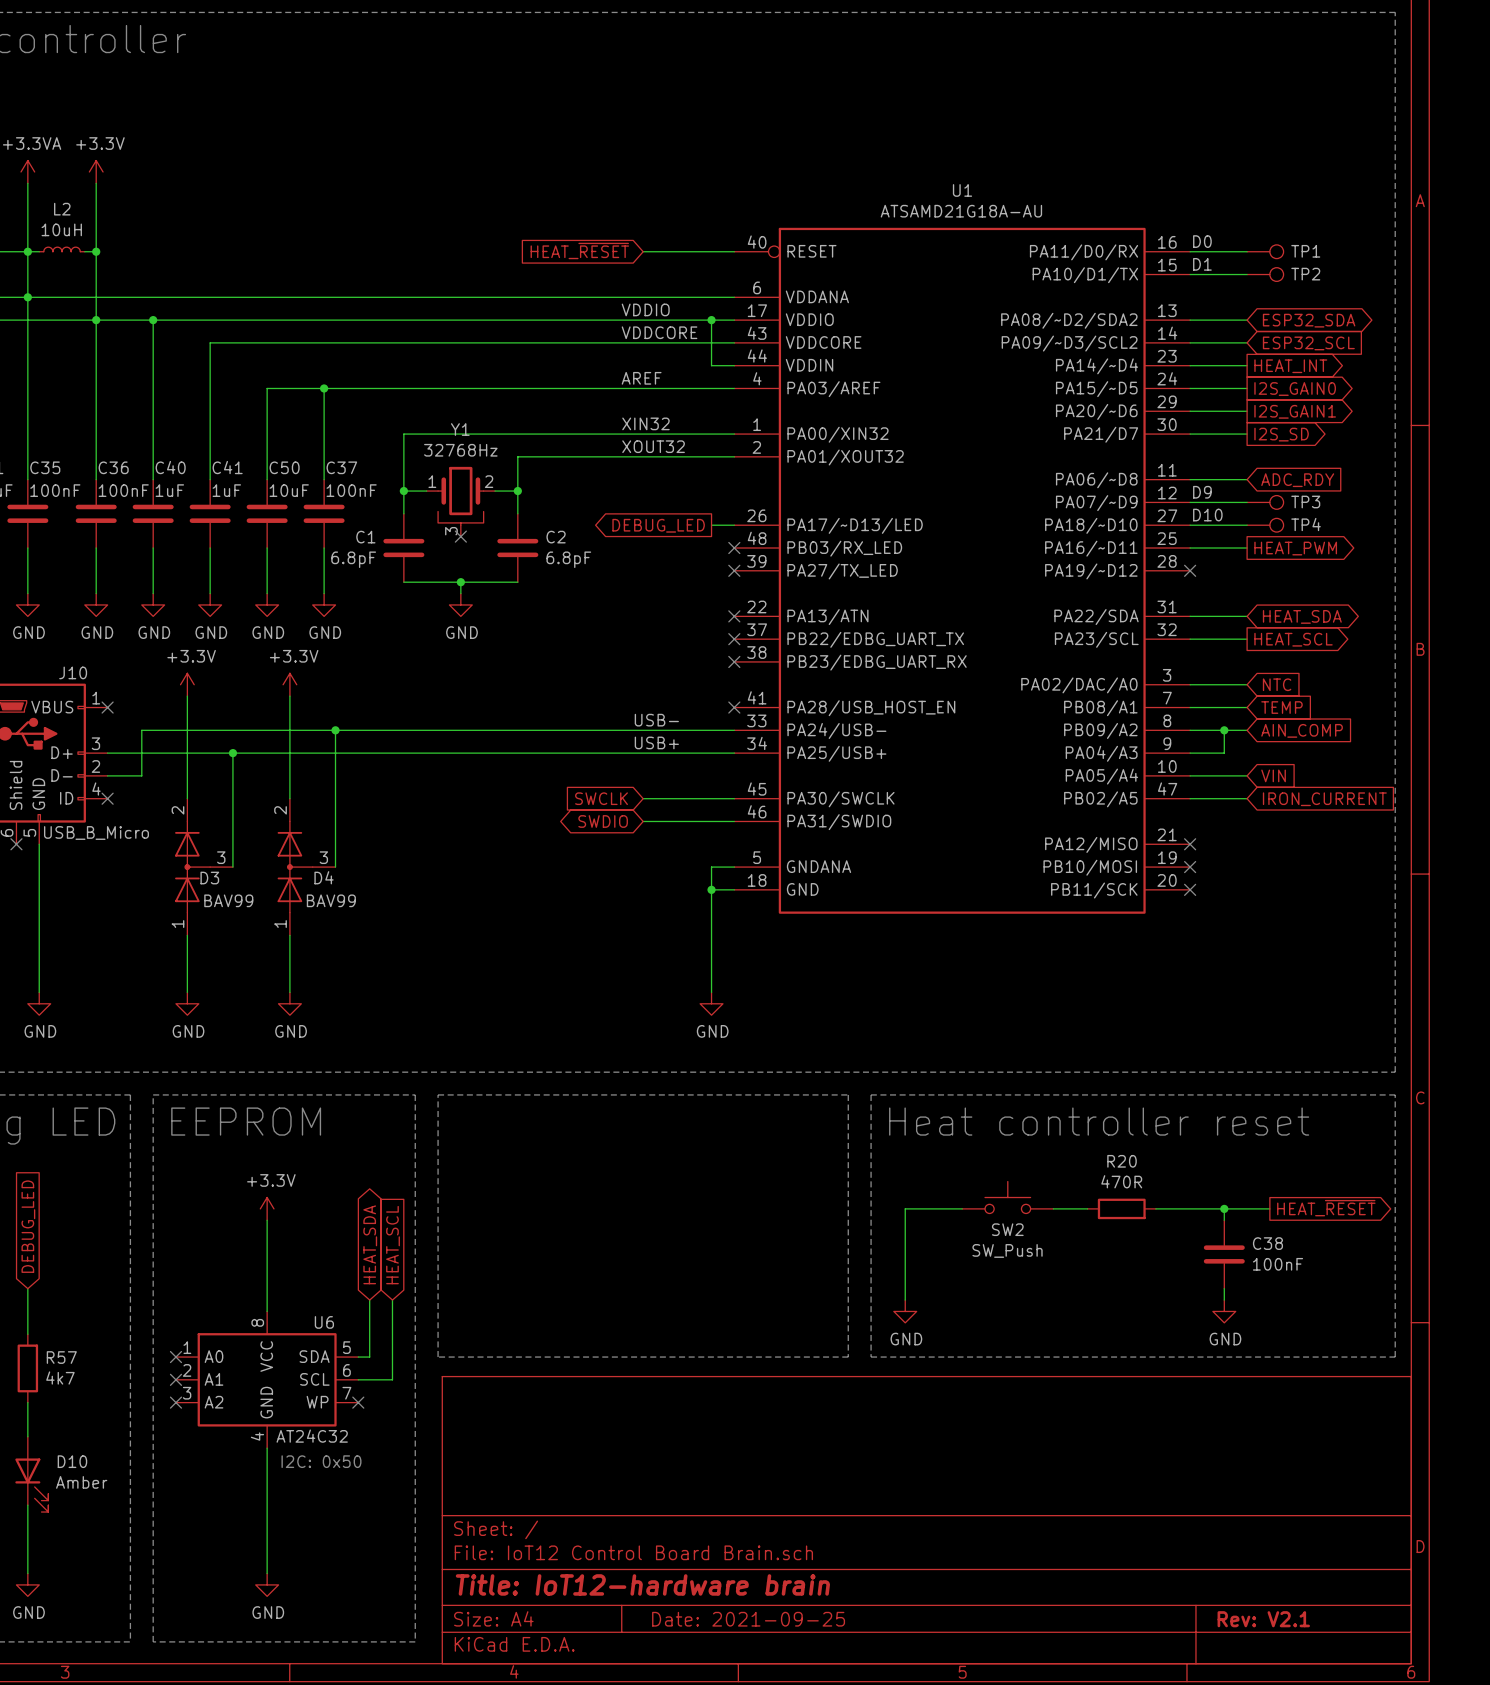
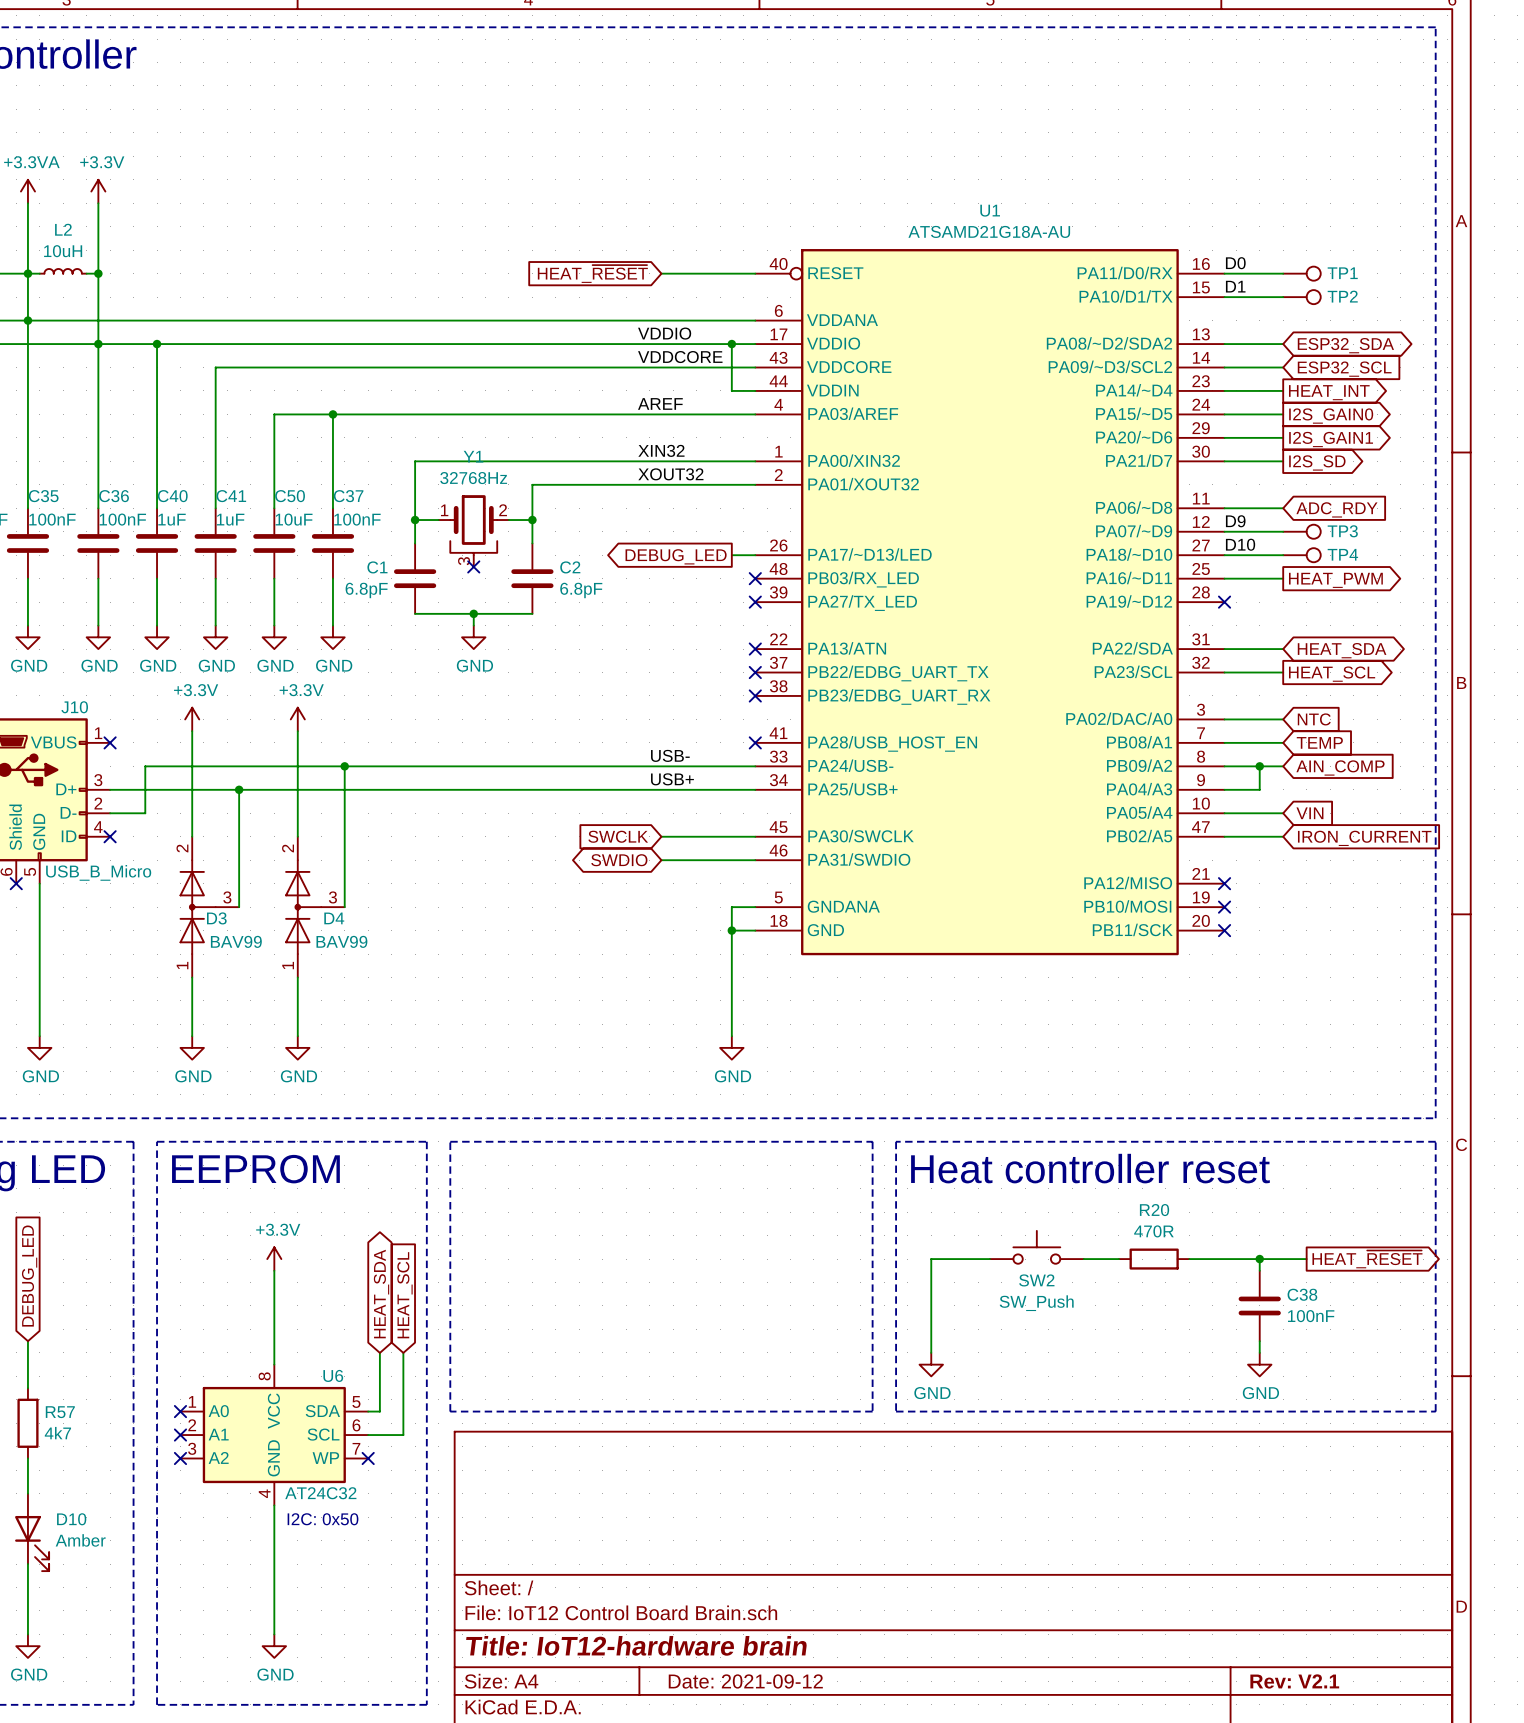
title block: Date: 2021-09-25 (748, 1619) -> Date: 2021-09-12 (745, 1681)

